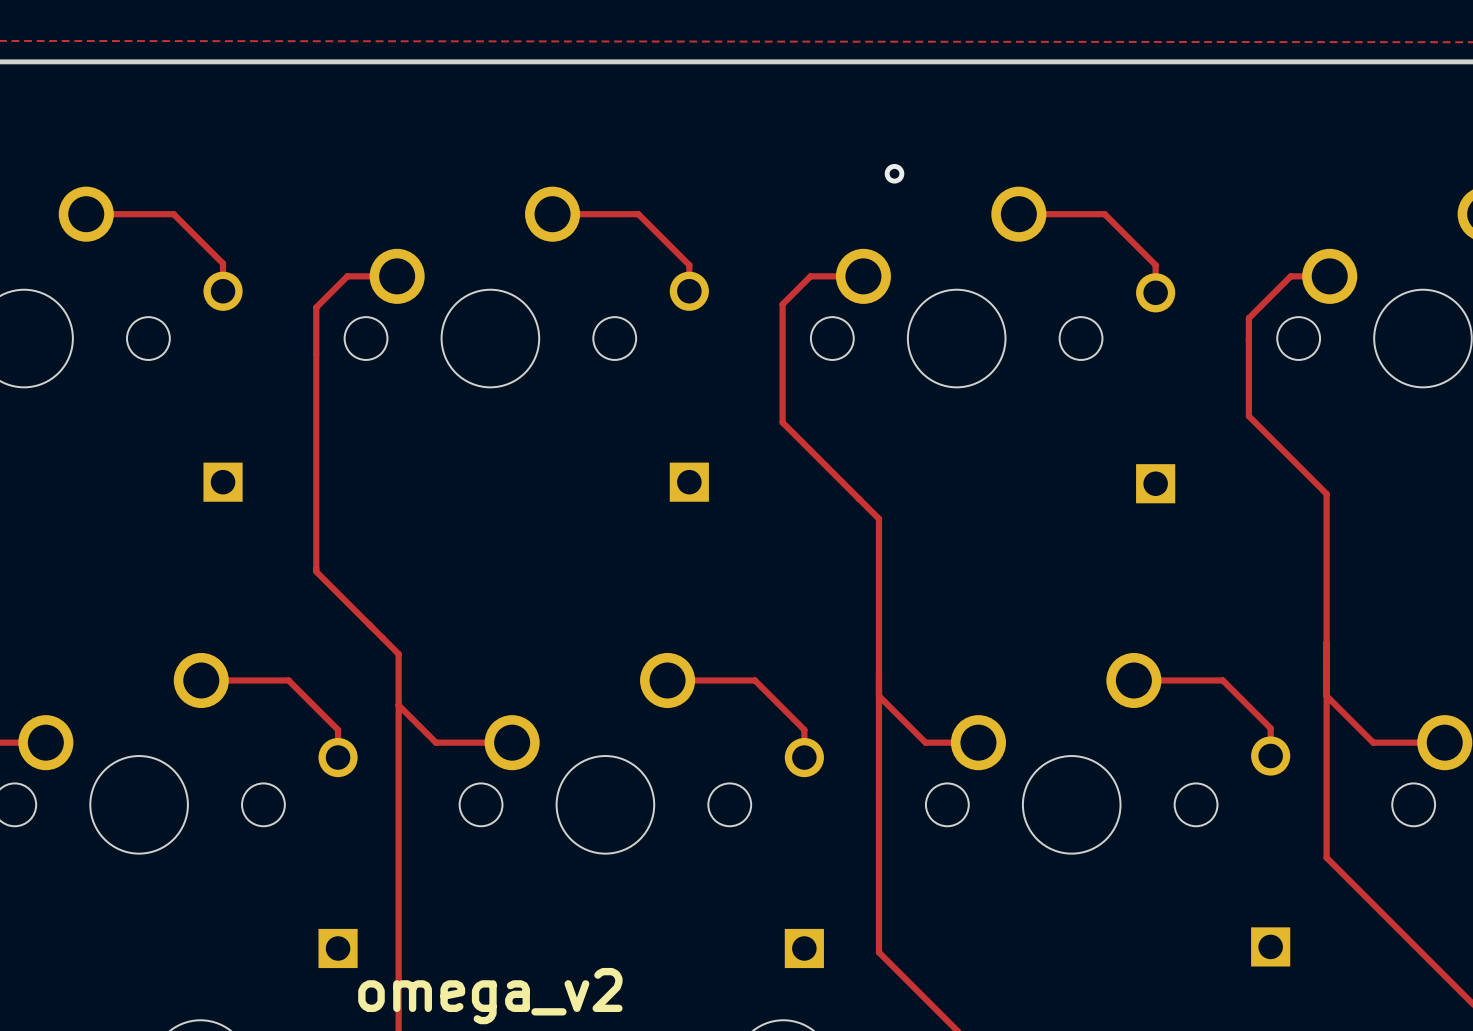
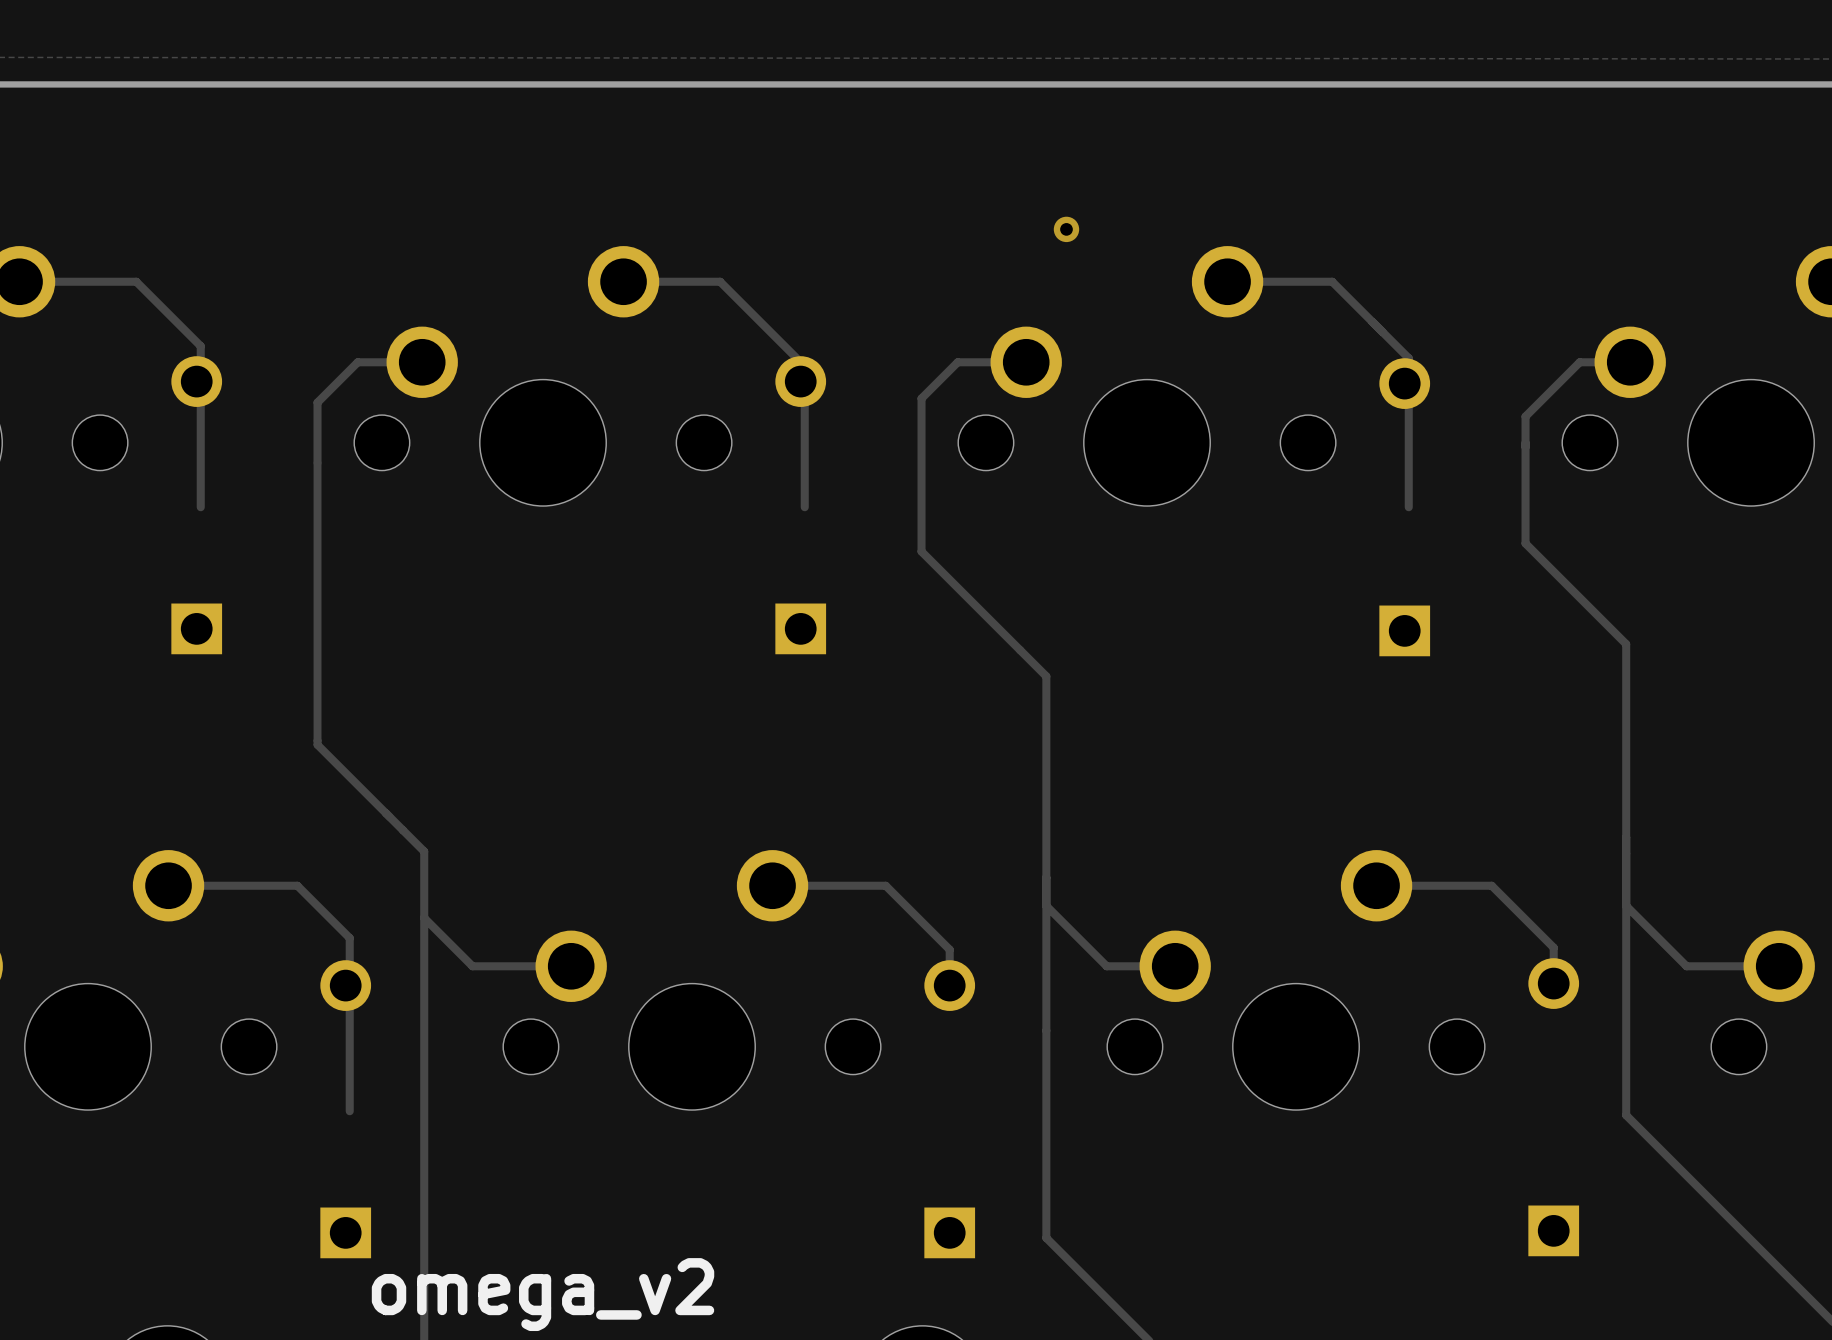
track: (173, 214) (223, 263) (223, 291) -> (132, 281) (136, 281) (200, 346) (200, 507)
track: (627, 214) (638, 214) (689, 265) (689, 292) -> (720, 281) (804, 366) (804, 507)
track: (1099, 214) (1104, 214) (1155, 265) (1155, 292) -> (1332, 281) (1408, 358) (1408, 507)
track: (288, 680) (338, 729) (338, 757) -> (281, 885) (297, 885) (349, 938) (349, 1111)

